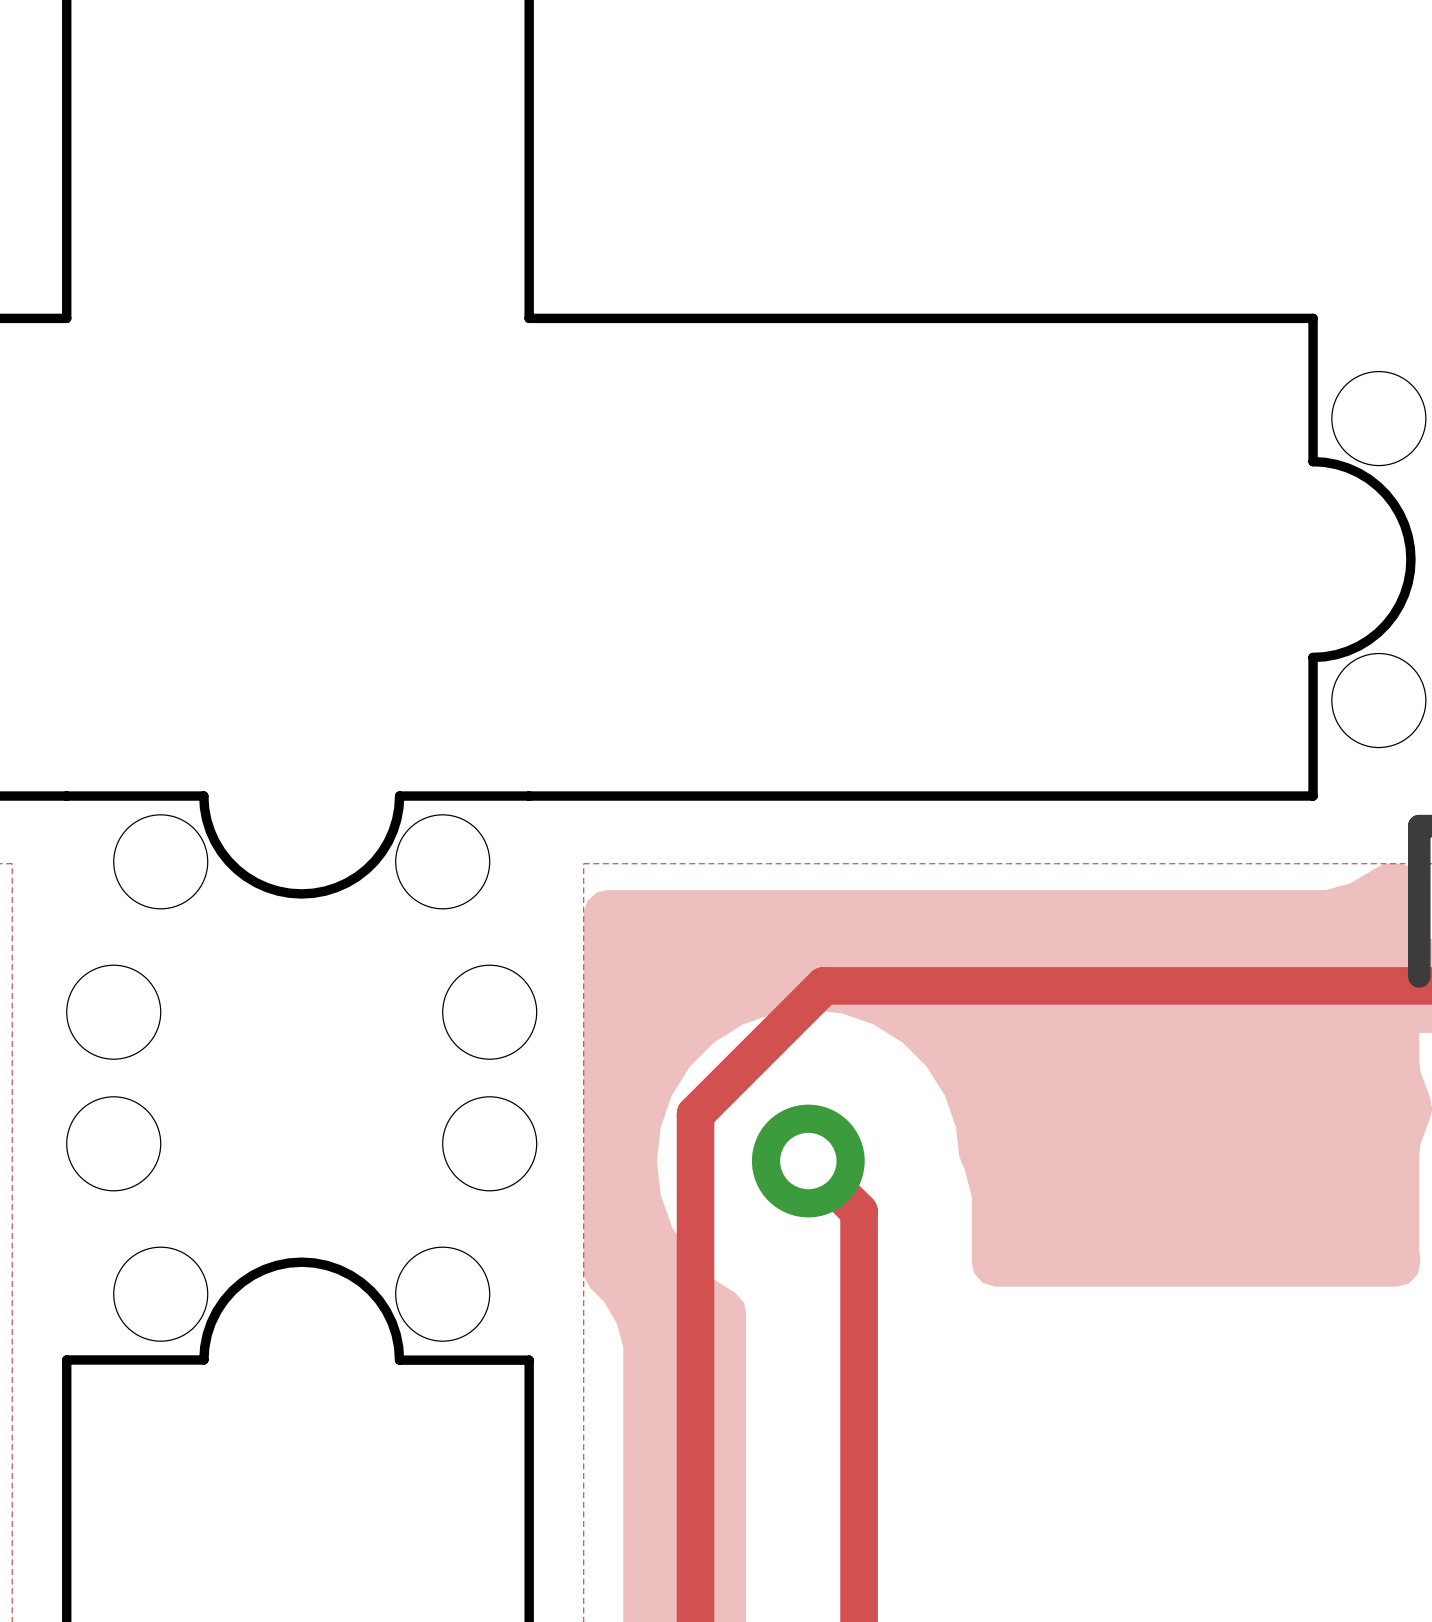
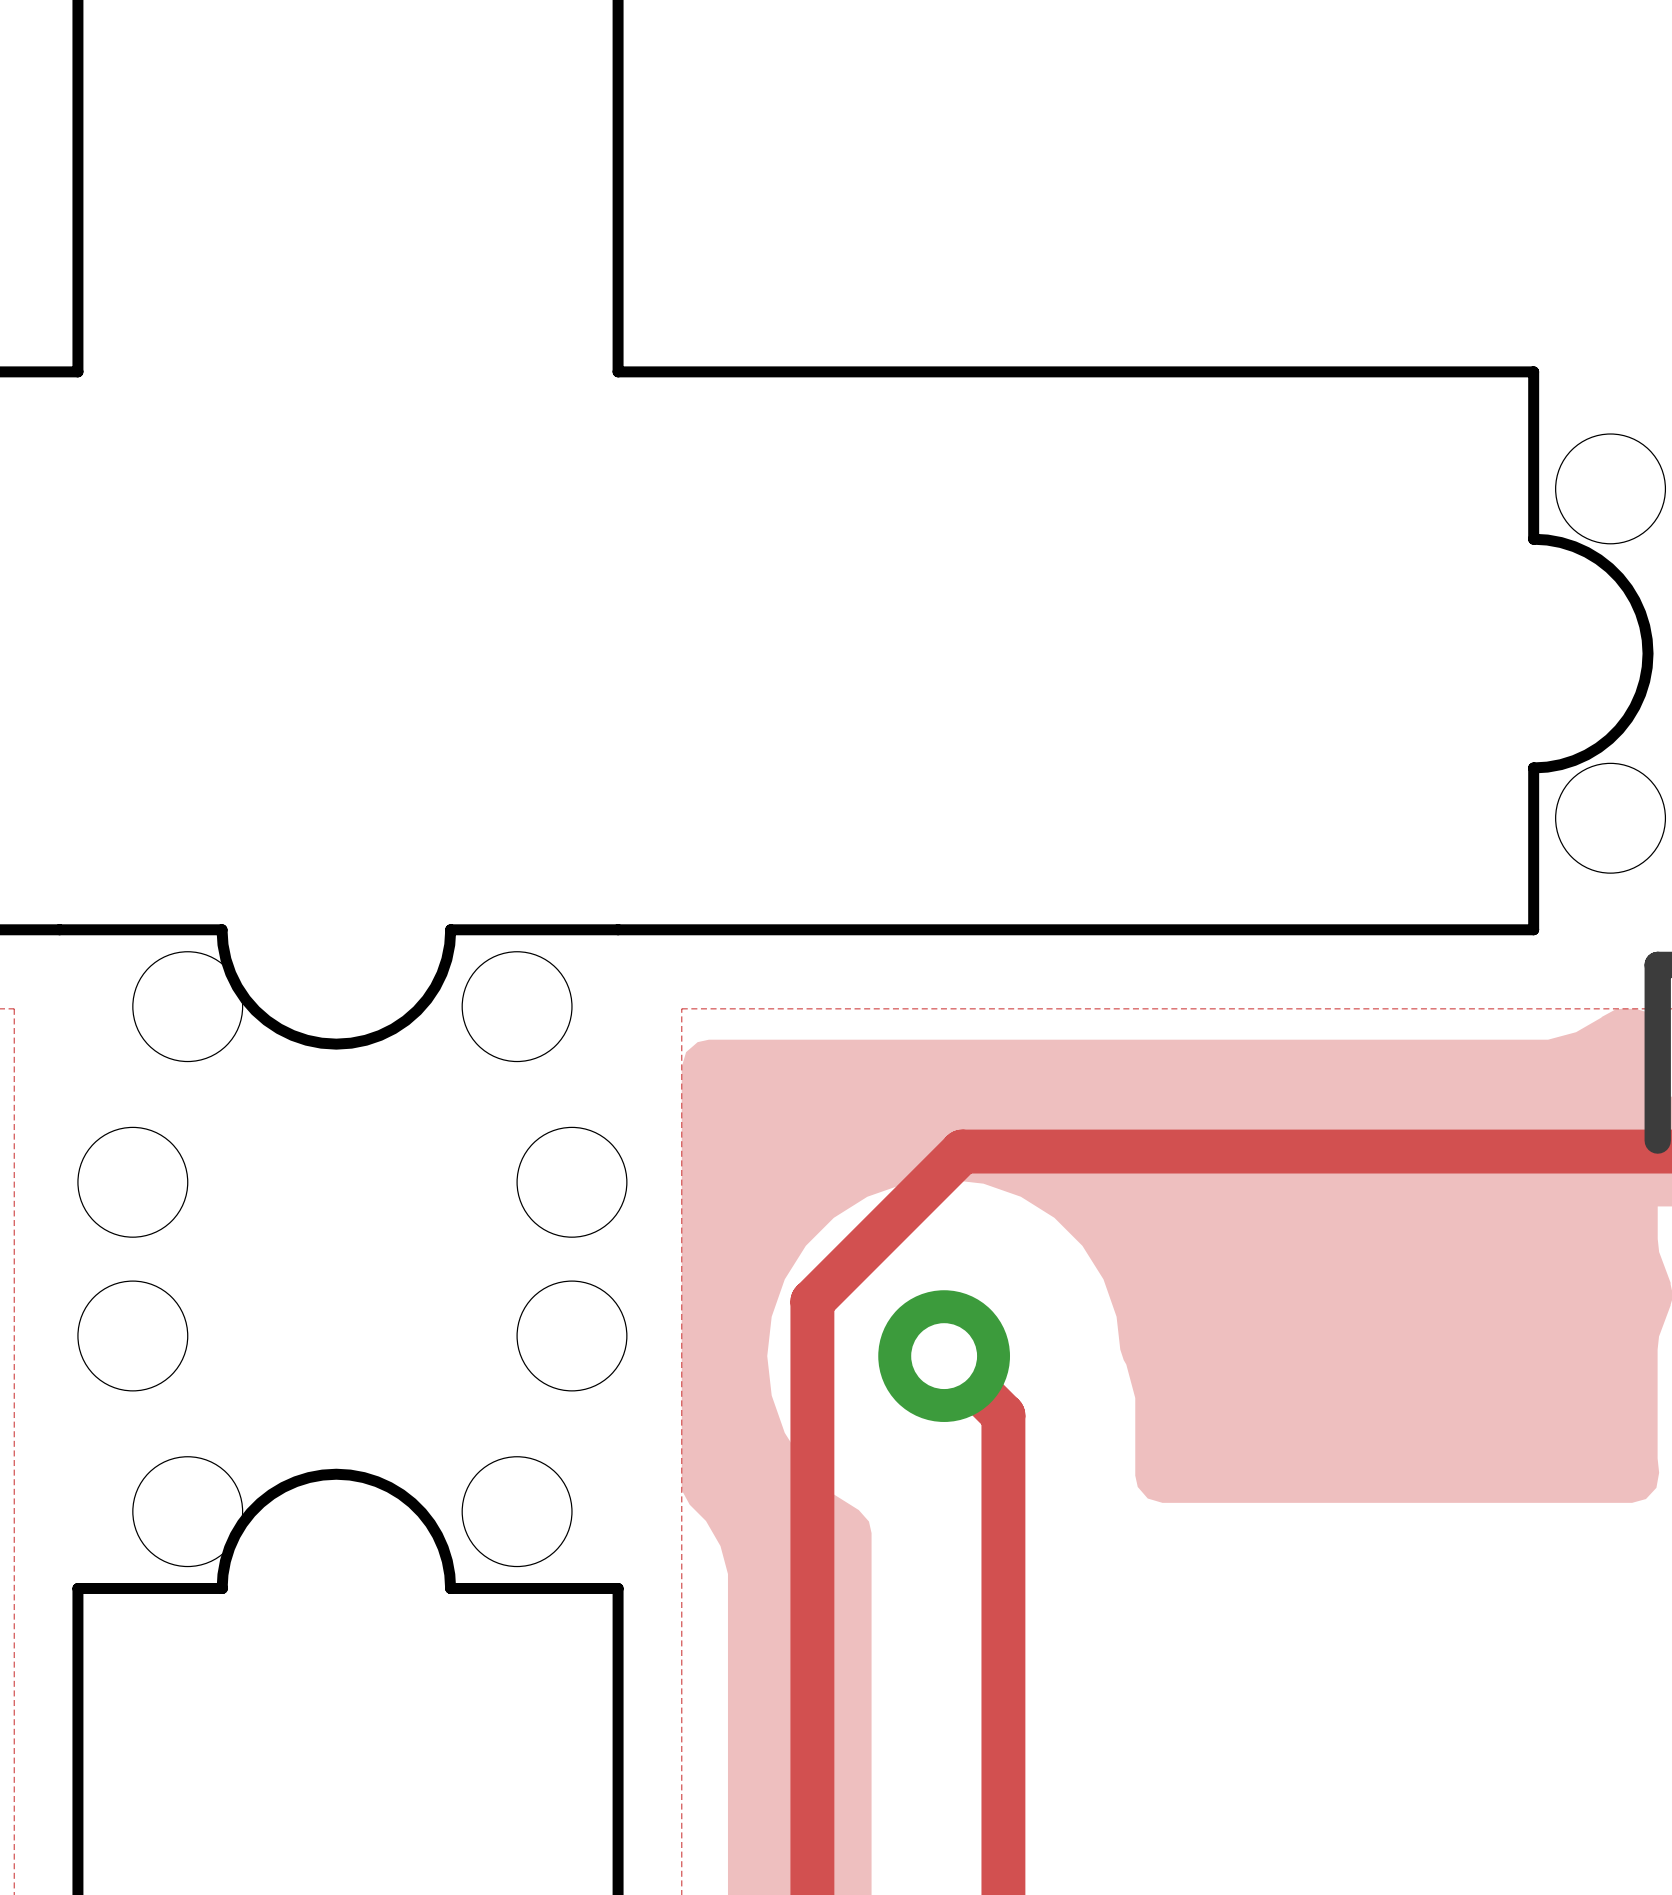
board edge: (190, 796) (203, 796) (206, 819) (215, 841) (236, 869) (266, 887) (301, 893) (336, 887) (366, 869) (382, 851) (393, 830) (399, 796) -> (222, 929) (222, 944) (230, 973) (245, 999) (255, 1010) (279, 1028) (292, 1035) (306, 1040) (336, 1044) (365, 1040) (380, 1035) (393, 1028) (417, 1010) (427, 999) (442, 973) (449, 944) (450, 929) (466, 929)
board edge: (190, 1359) (203, 1359) (204, 1347) (211, 1322) (216, 1311) (232, 1290) (252, 1275) (264, 1269) (288, 1263) (301, 1262) (314, 1263) (339, 1269) (350, 1275) (370, 1290) (386, 1311) (392, 1322) (396, 1334) (399, 1359) -> (222, 1588) (222, 1574) (229, 1547) (235, 1535) (250, 1512) (271, 1494) (283, 1487) (309, 1477) (336, 1474) (363, 1477) (376, 1481) (401, 1494) (412, 1502) (430, 1523) (443, 1547) (449, 1574) (450, 1588) (466, 1588)

